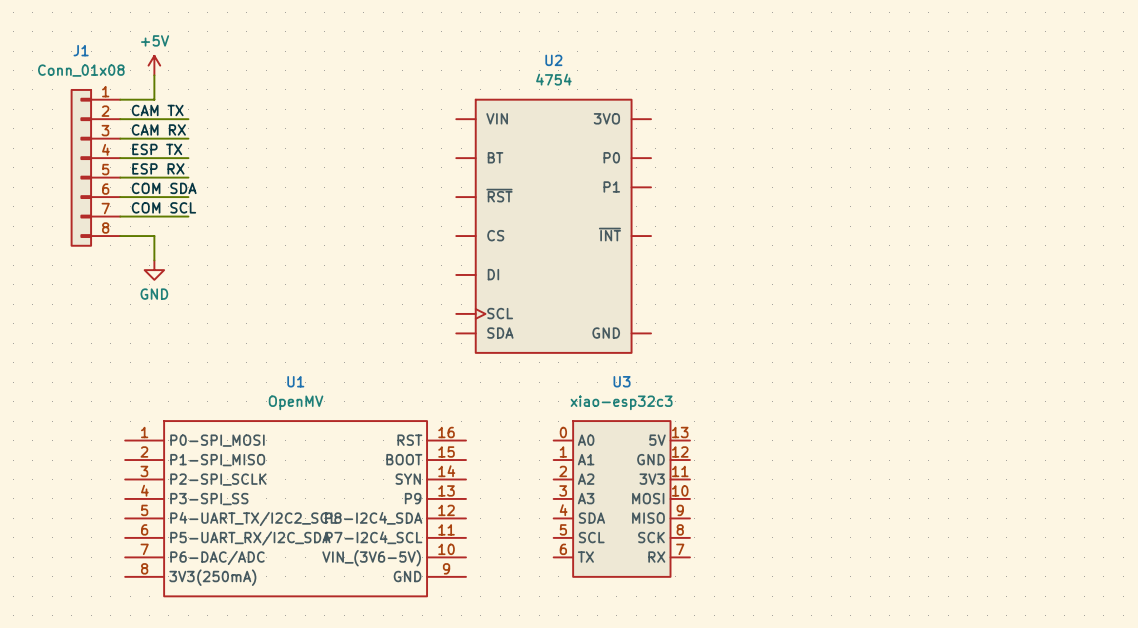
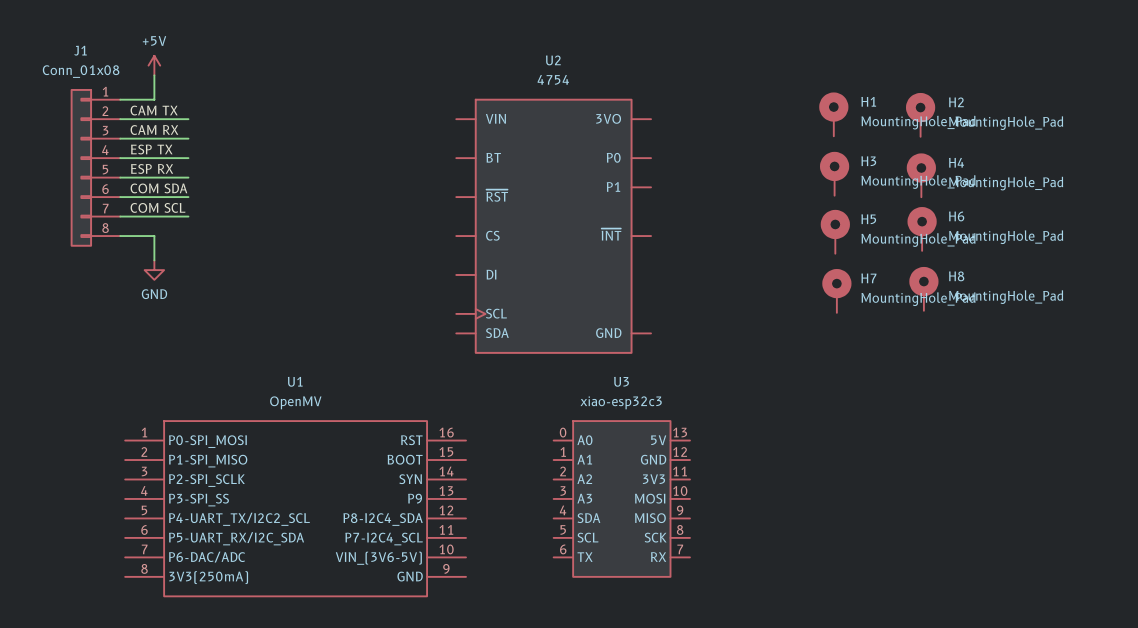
H1: none -> MountingHole_Pad (833, 114)
H2: none -> MountingHole_Pad (920, 114)
H3: none -> MountingHole_Pad (834, 173)
H4: none -> MountingHole_Pad (921, 175)
H6: none -> MountingHole_Pad (922, 228)
H5: none -> MountingHole_Pad (835, 231)
H8: none -> MountingHole_Pad (923, 288)
H7: none -> MountingHole_Pad (836, 290)

